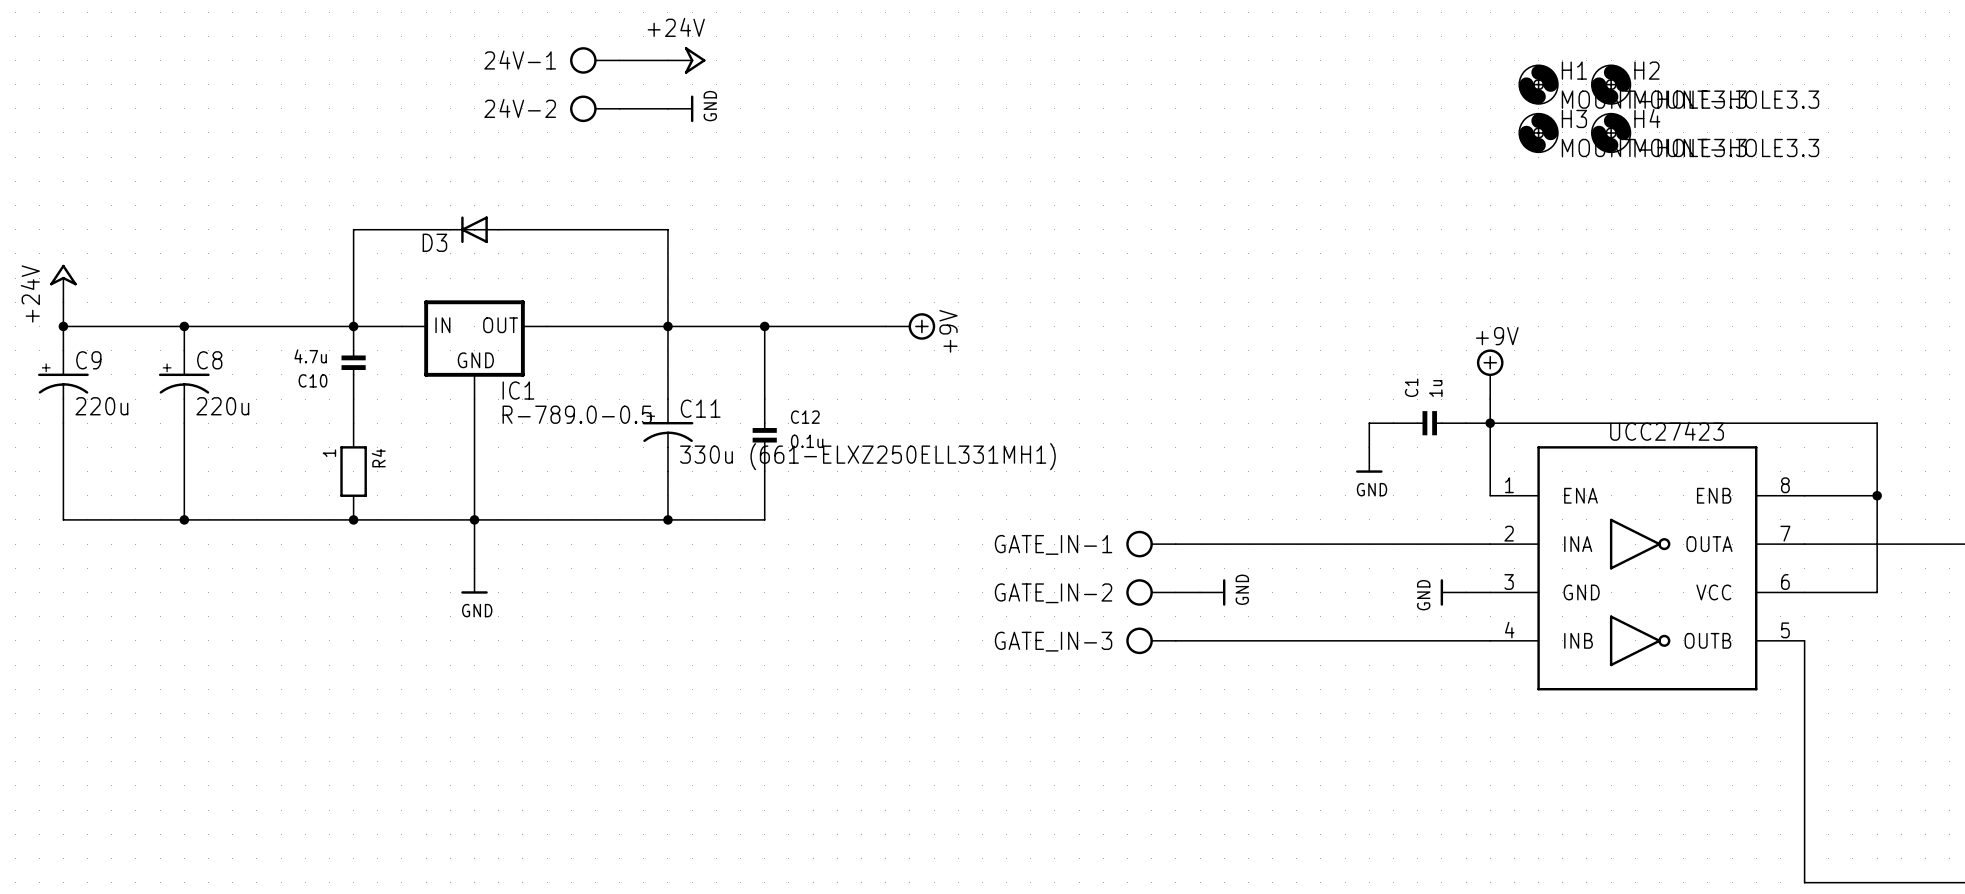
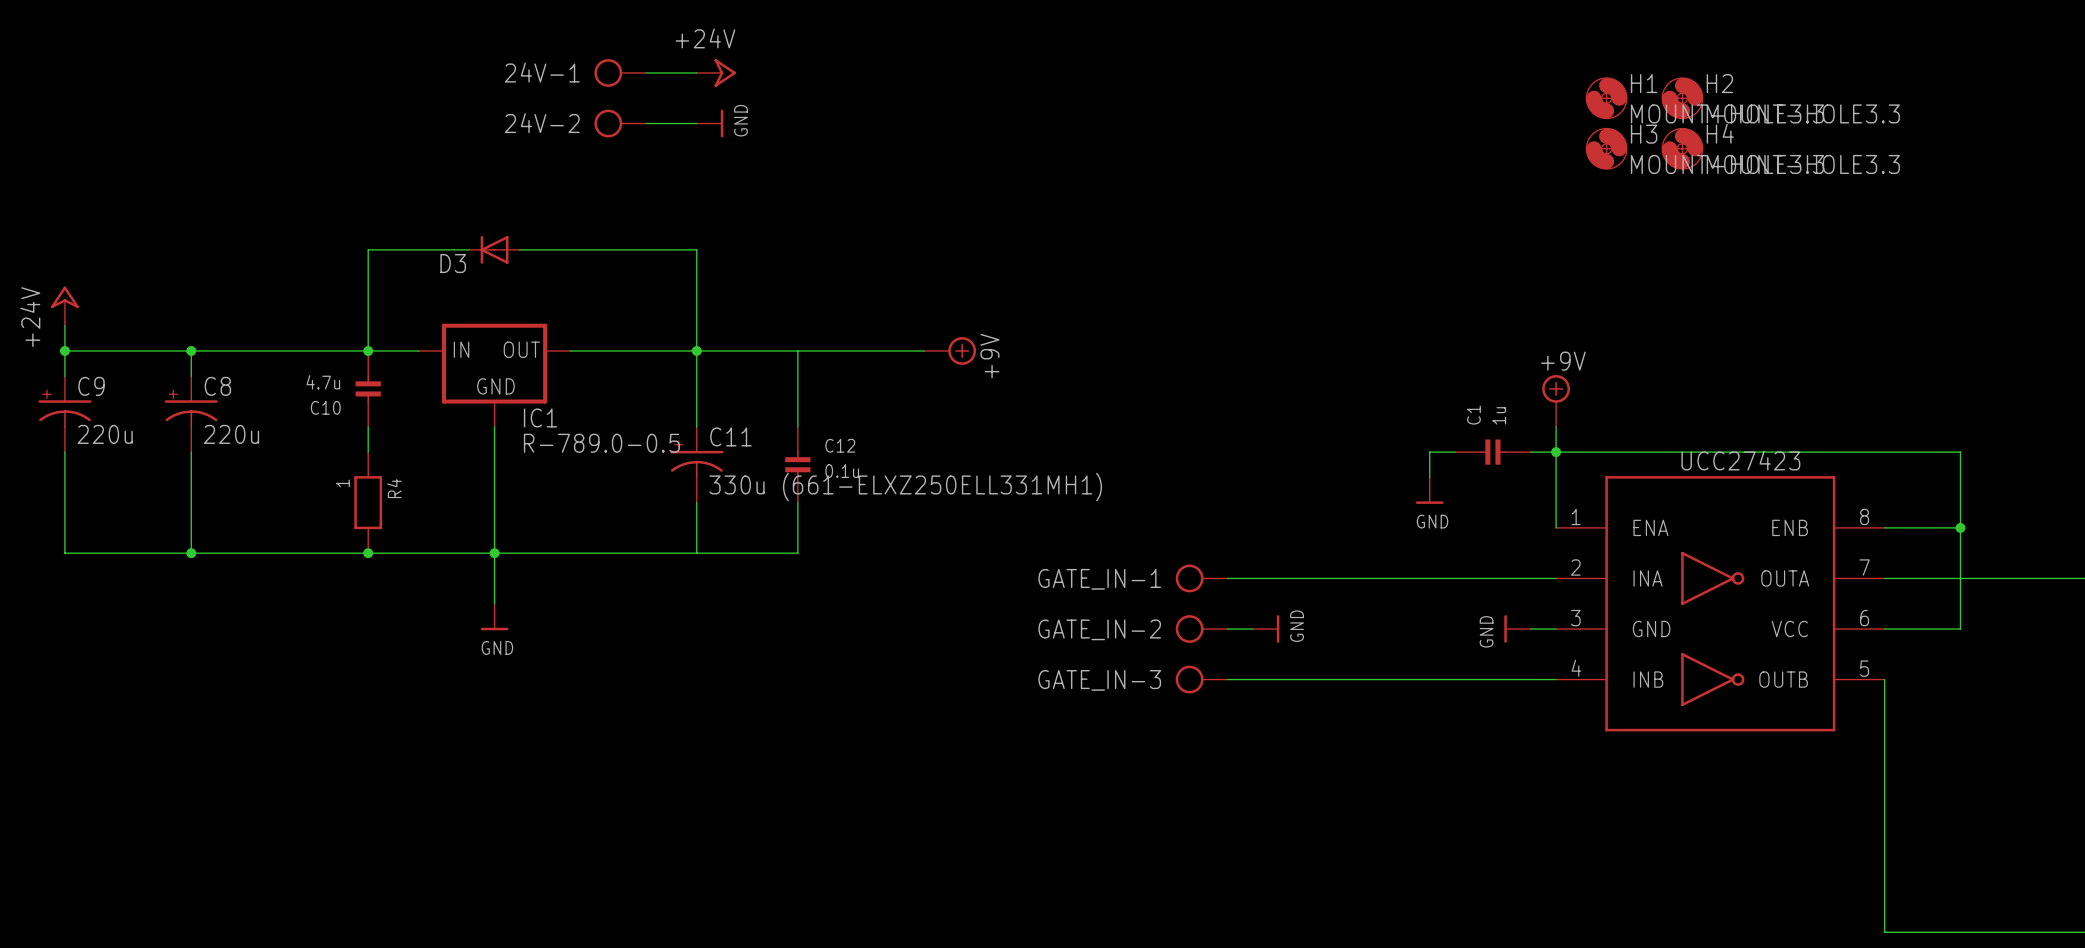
junction: (764, 326) -> none
junction: (667, 519) -> none

